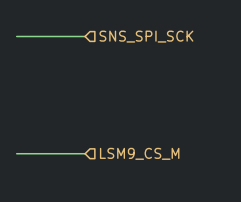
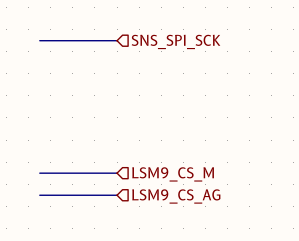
wire: none -> (39, 195) (117, 195)
hierarchical label: none -> LSM9_CS_AG (176, 196)

